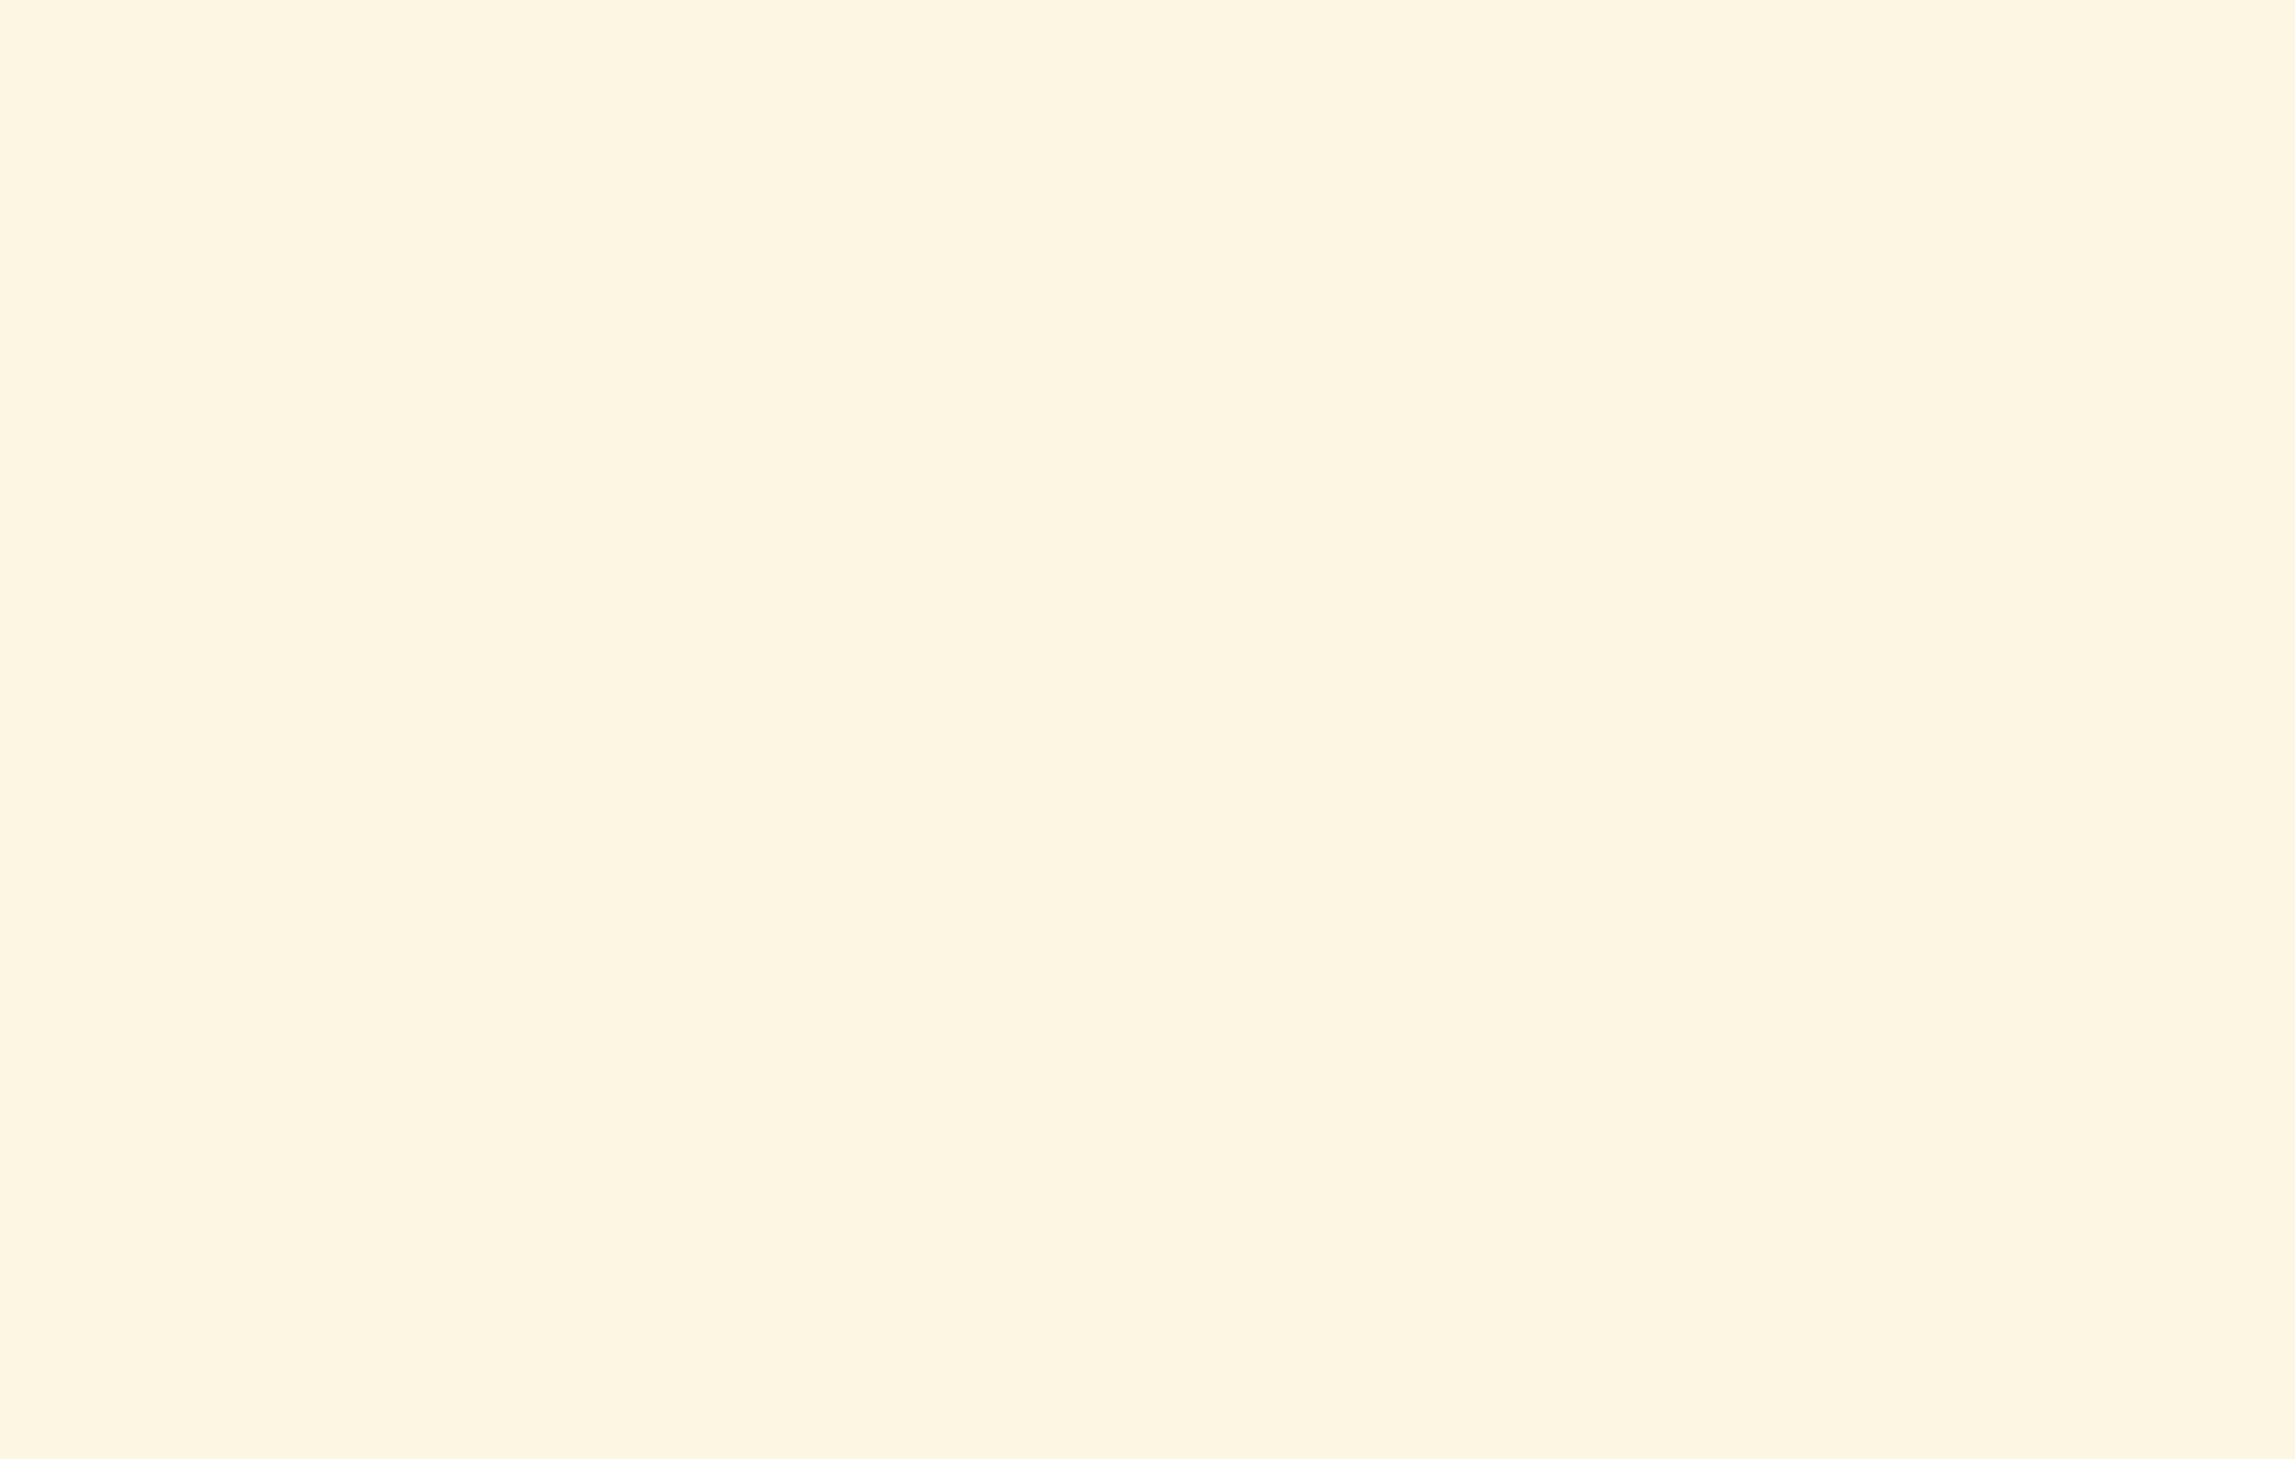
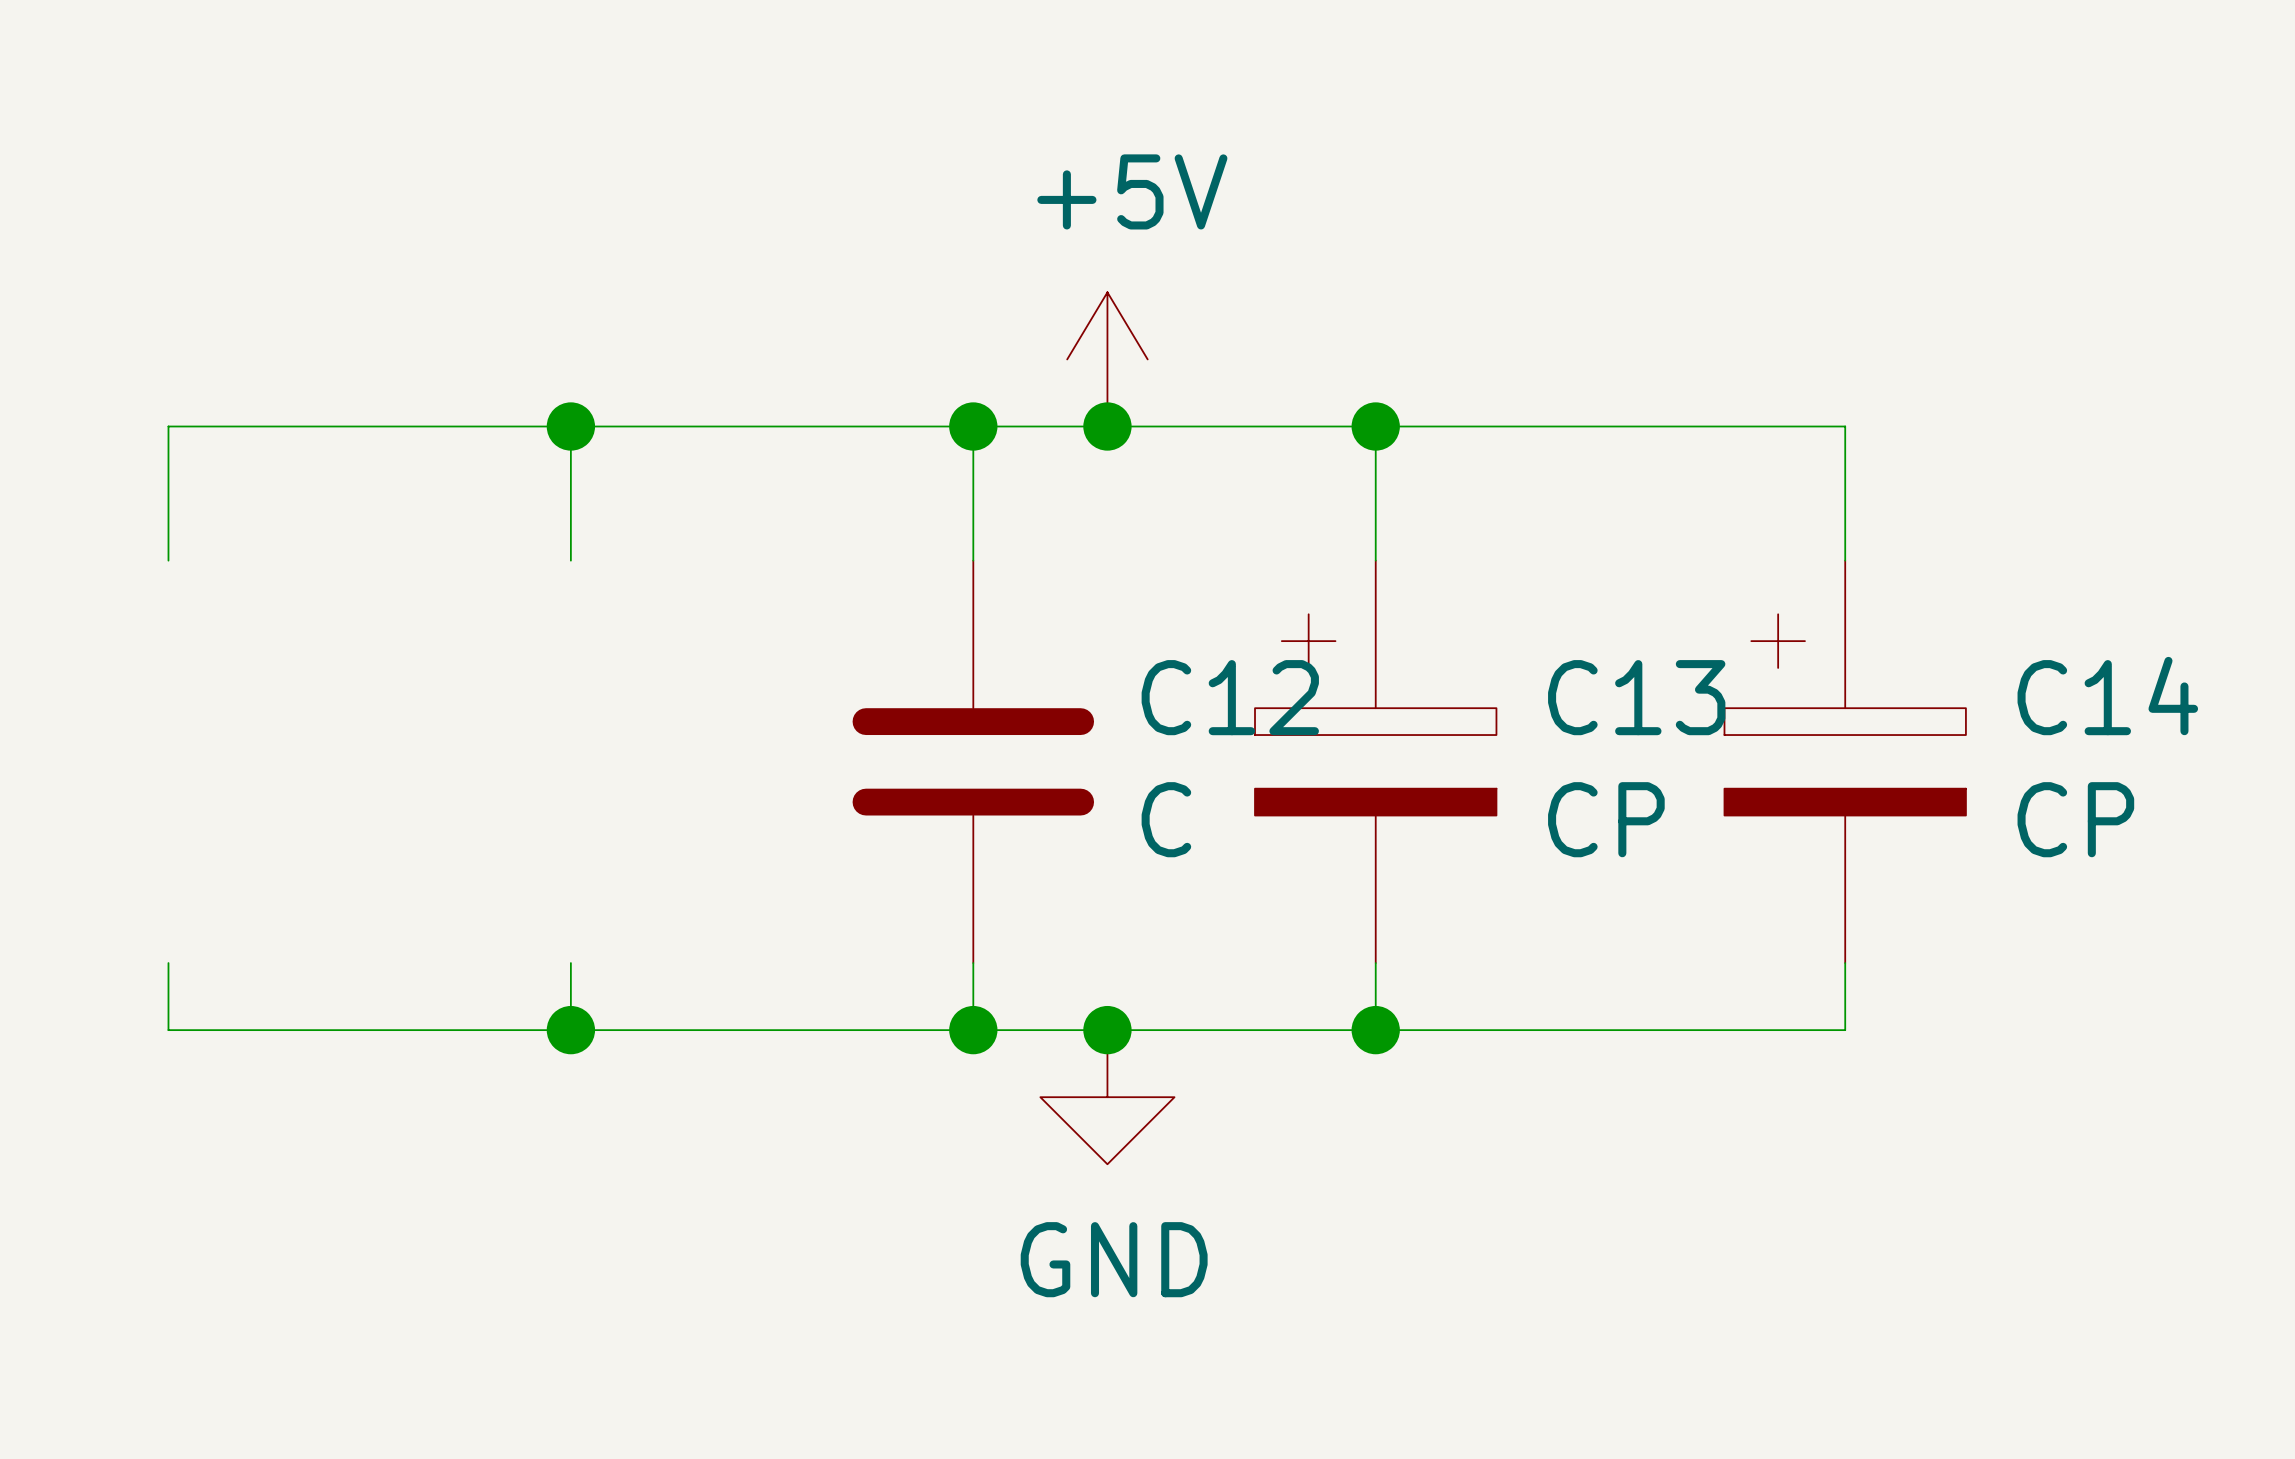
power symbol: none -> +5V (1107, 359)
wire: none -> (570, 426) (570, 560)
junction: none -> (570, 426)
wire: none -> (973, 426) (973, 560)
junction: none -> (973, 426)
junction: none -> (1107, 426)
wire: none -> (1375, 426) (1375, 560)
junction: none -> (1375, 426)
wire: none -> (168, 560) (168, 426) (1845, 426) (1845, 560)
C12: none -> C (973, 761)
C13: none -> CP (1375, 761)
C14: none -> CP (1845, 761)
wire: none -> (168, 963) (168, 1030) (1845, 1030) (1845, 963)
wire: none -> (570, 963) (570, 1030)
wire: none -> (973, 963) (973, 1030)
wire: none -> (1375, 963) (1375, 1030)
junction: none -> (570, 1030)
junction: none -> (973, 1030)
junction: none -> (1107, 1030)
junction: none -> (1375, 1030)
power symbol: none -> GND (1107, 1097)

